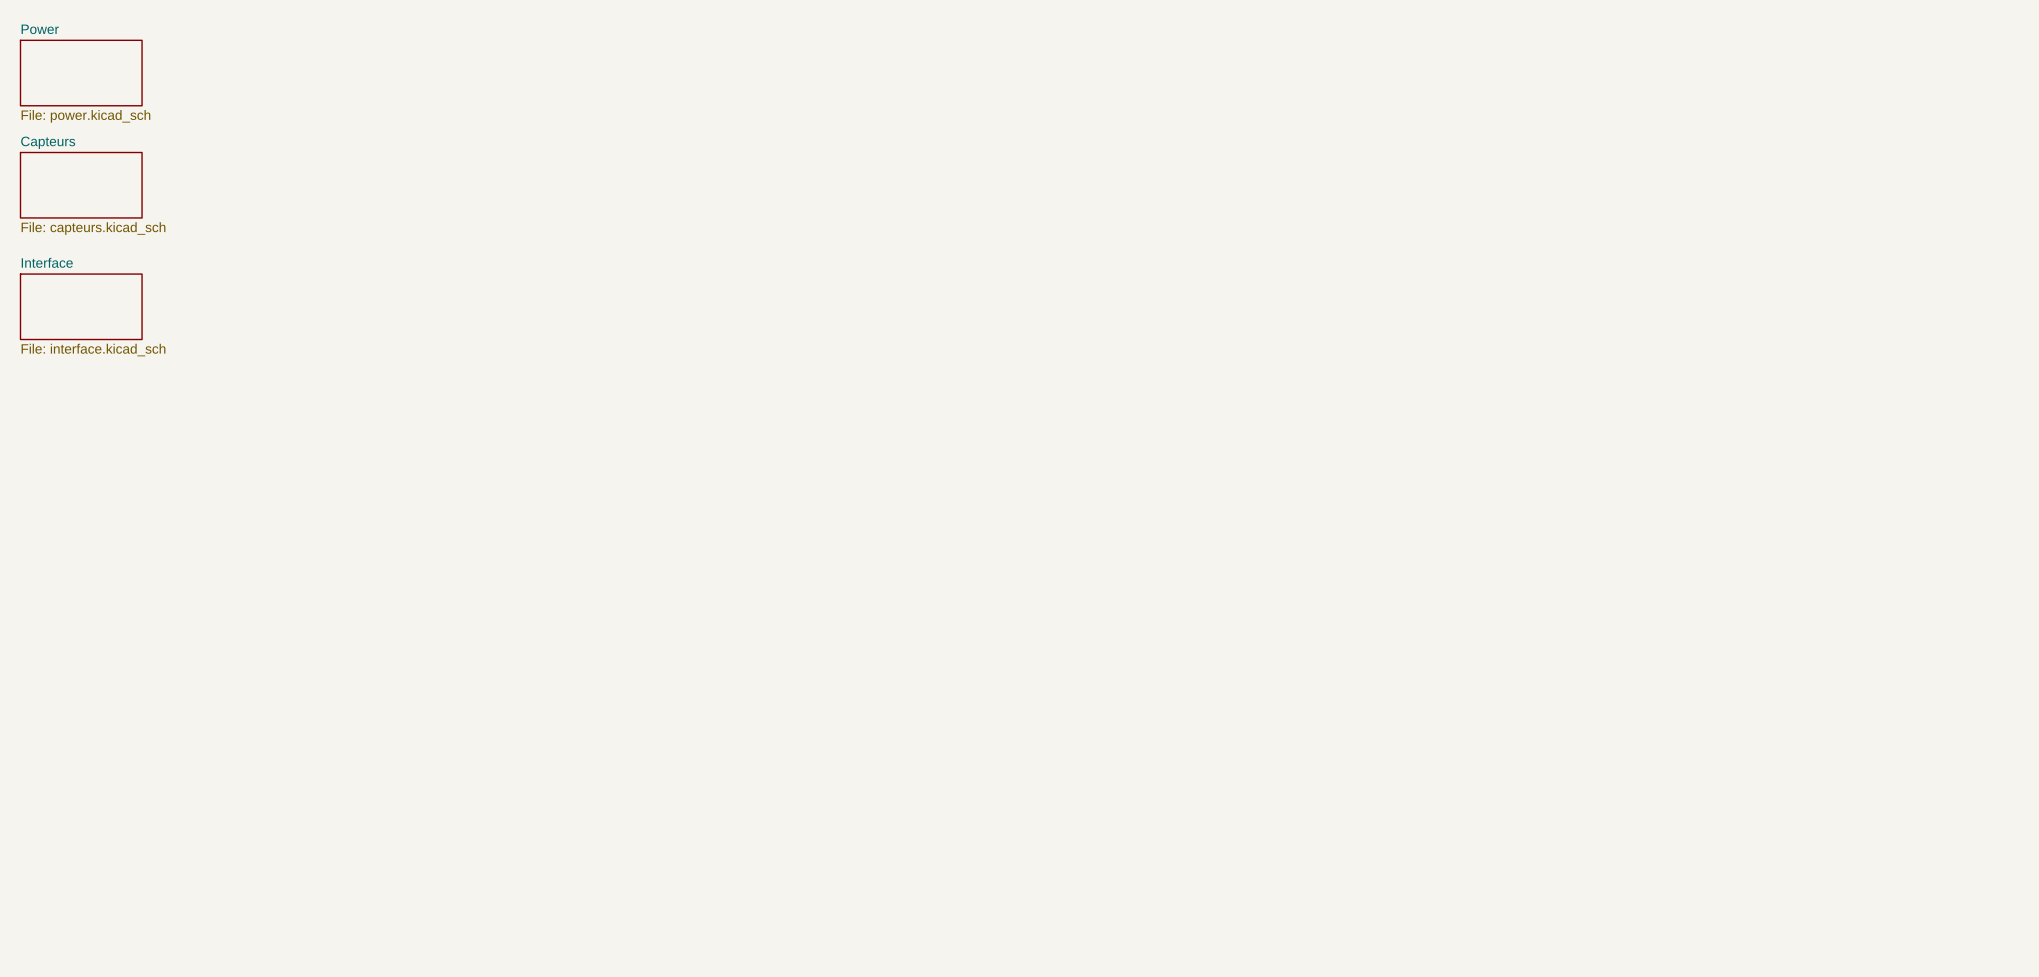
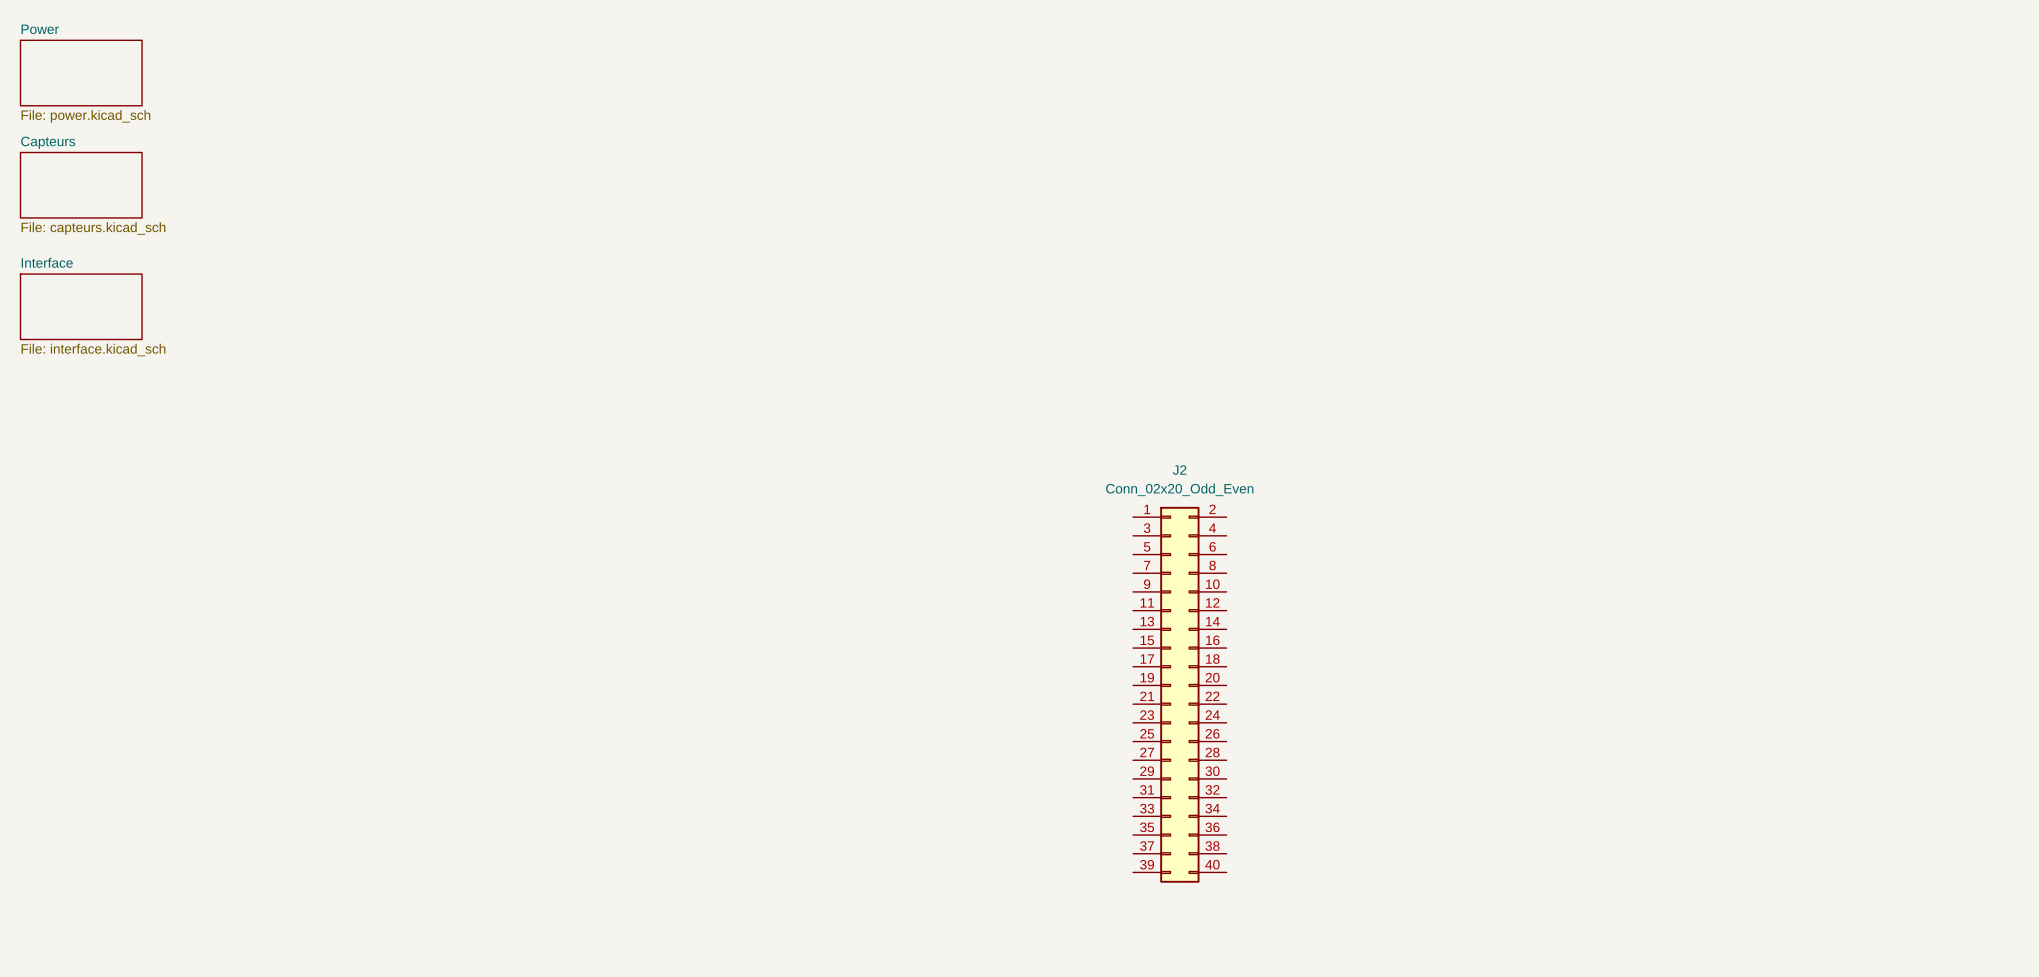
J2: none -> Conn_02x20_Odd_Even (1179, 694)

